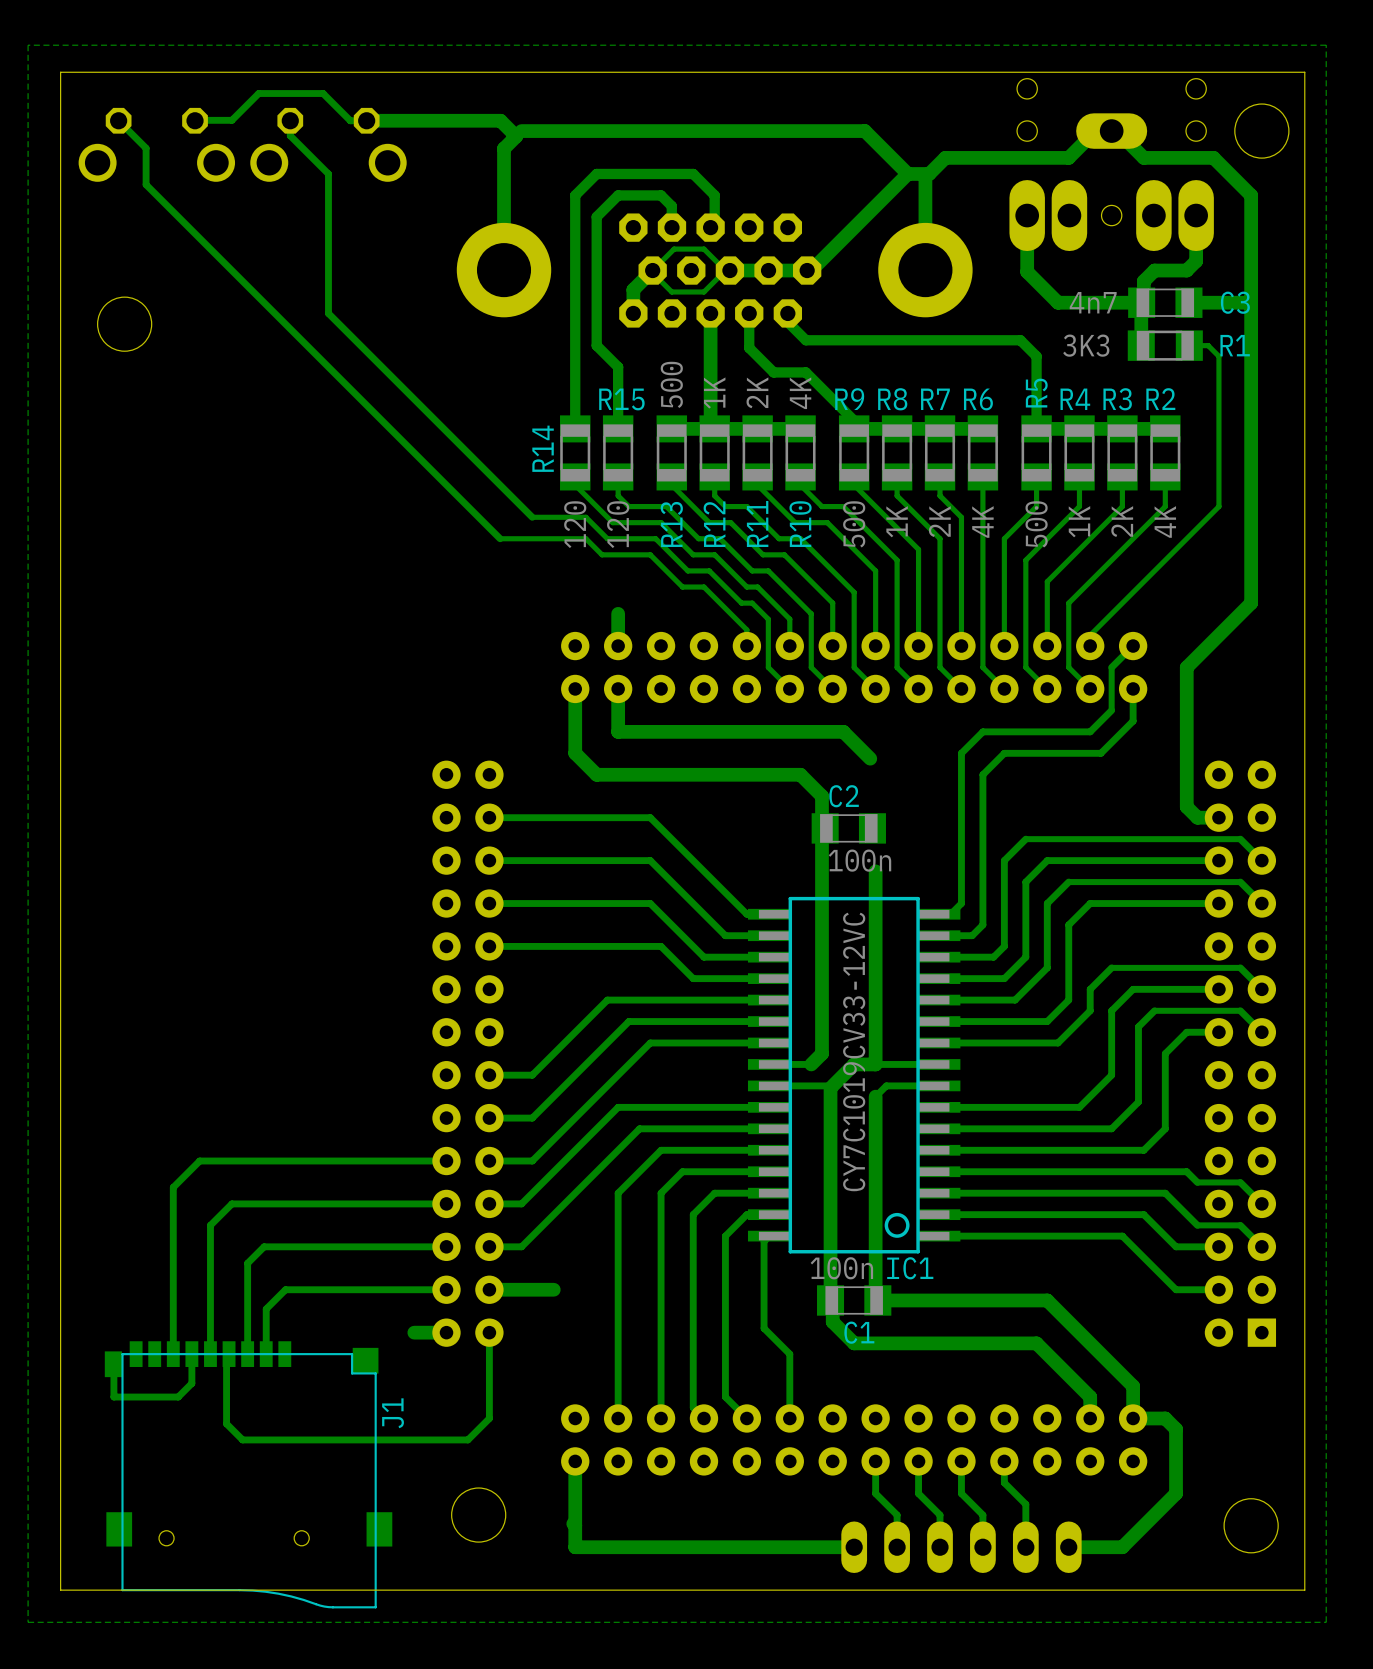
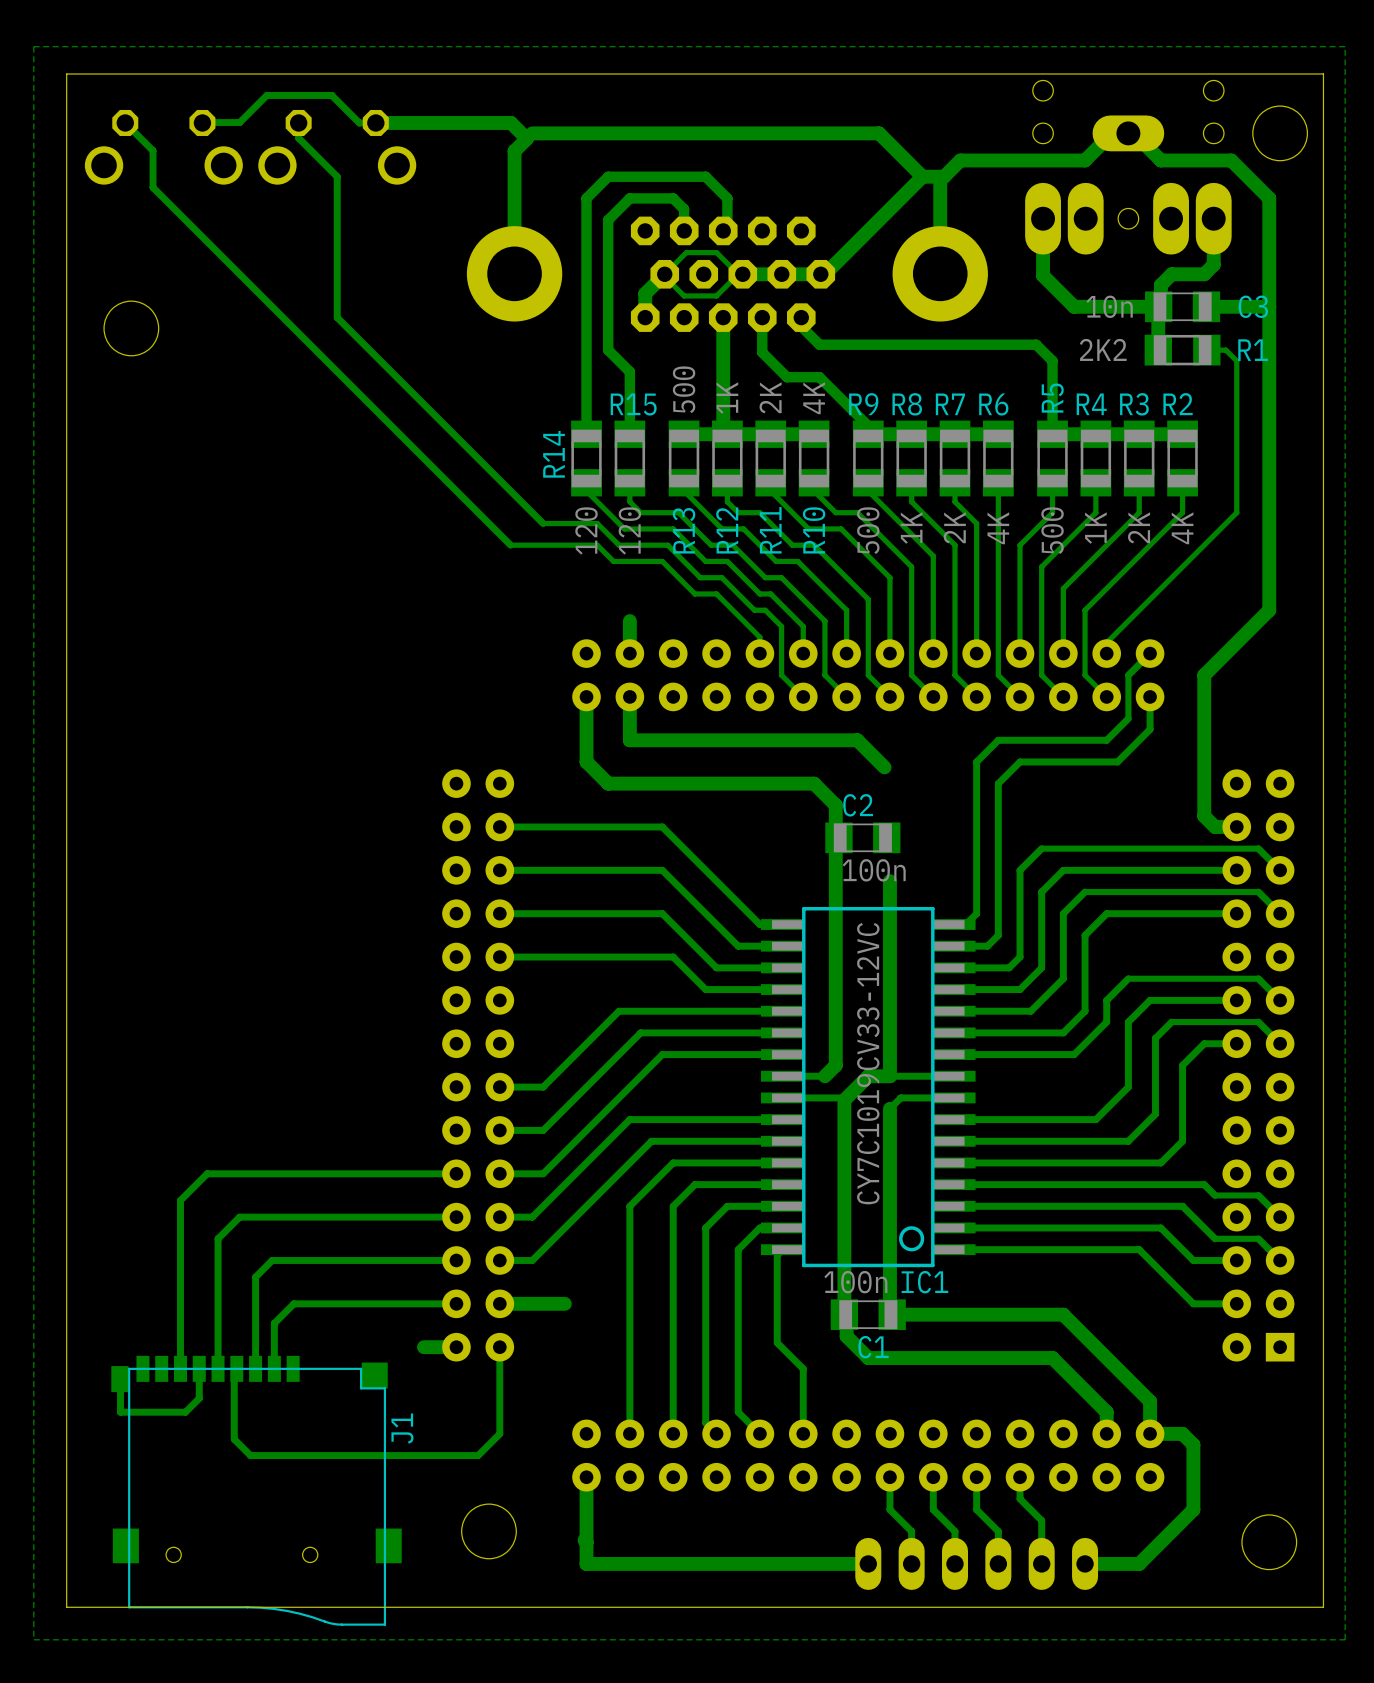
C3 value: 4n7 (1093, 302) -> 10n (1109, 306)
R1 value: 3K3 (1086, 345) -> 2K2 (1103, 349)

